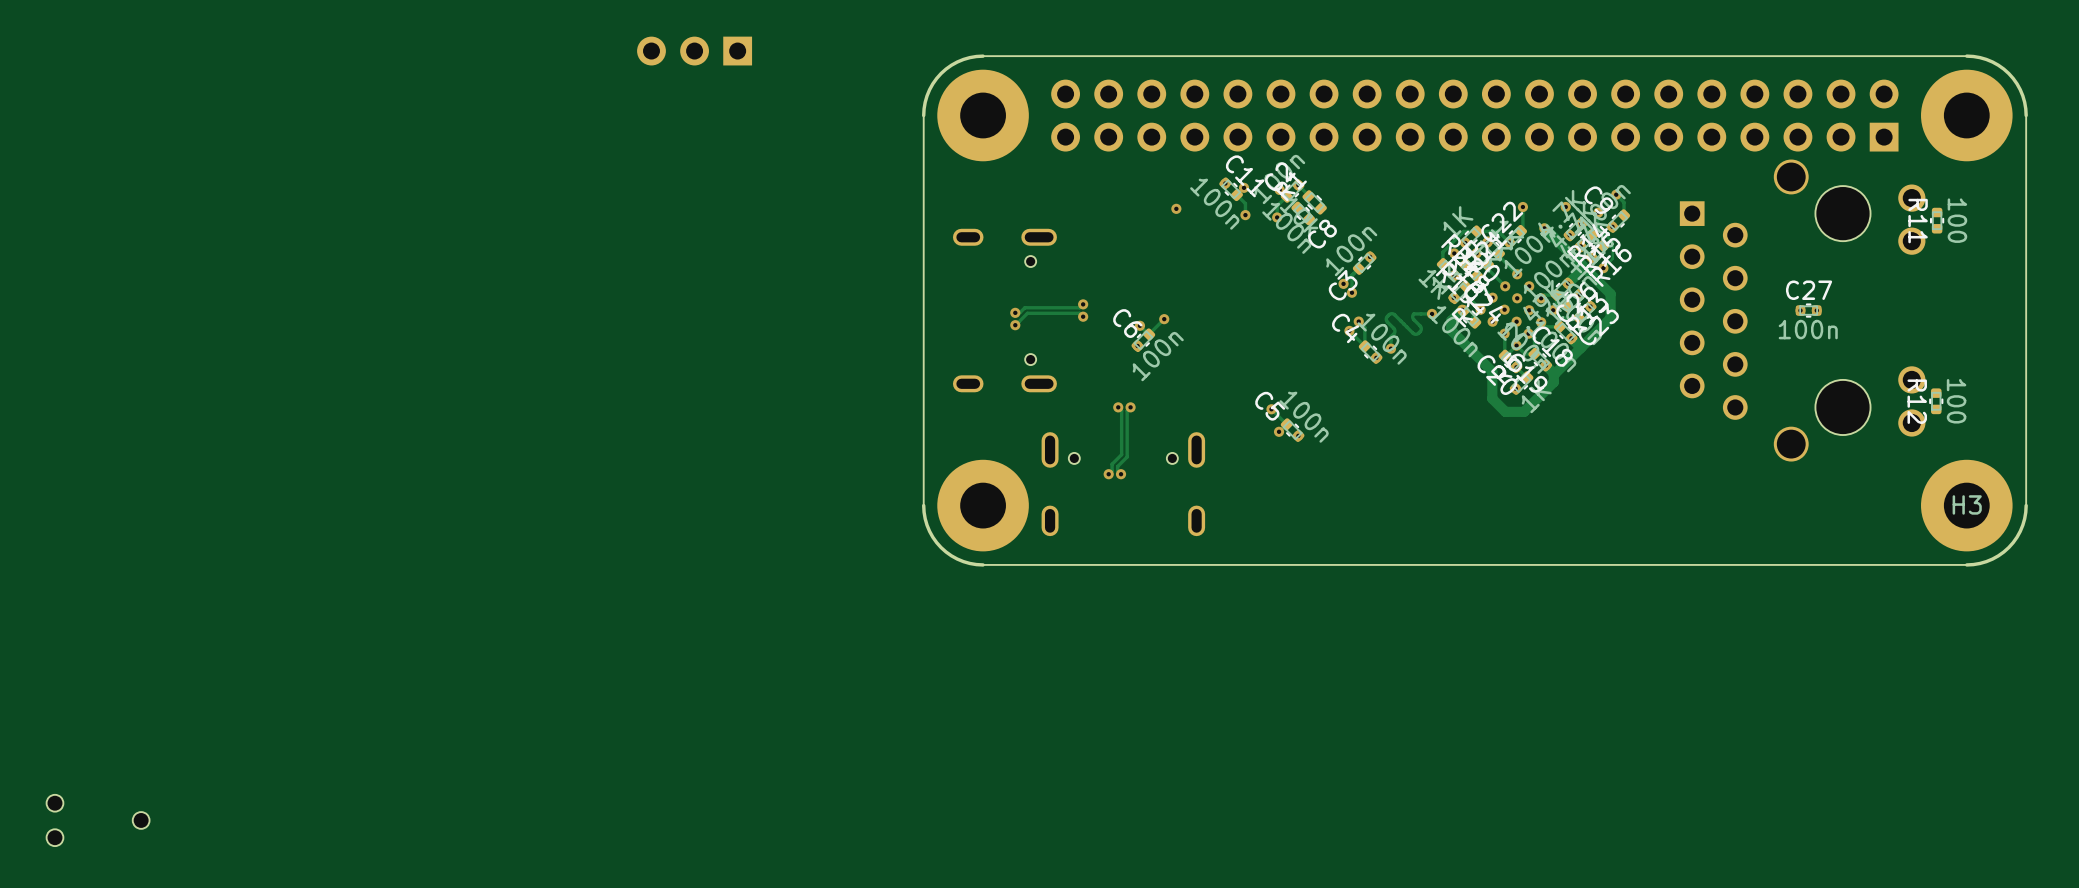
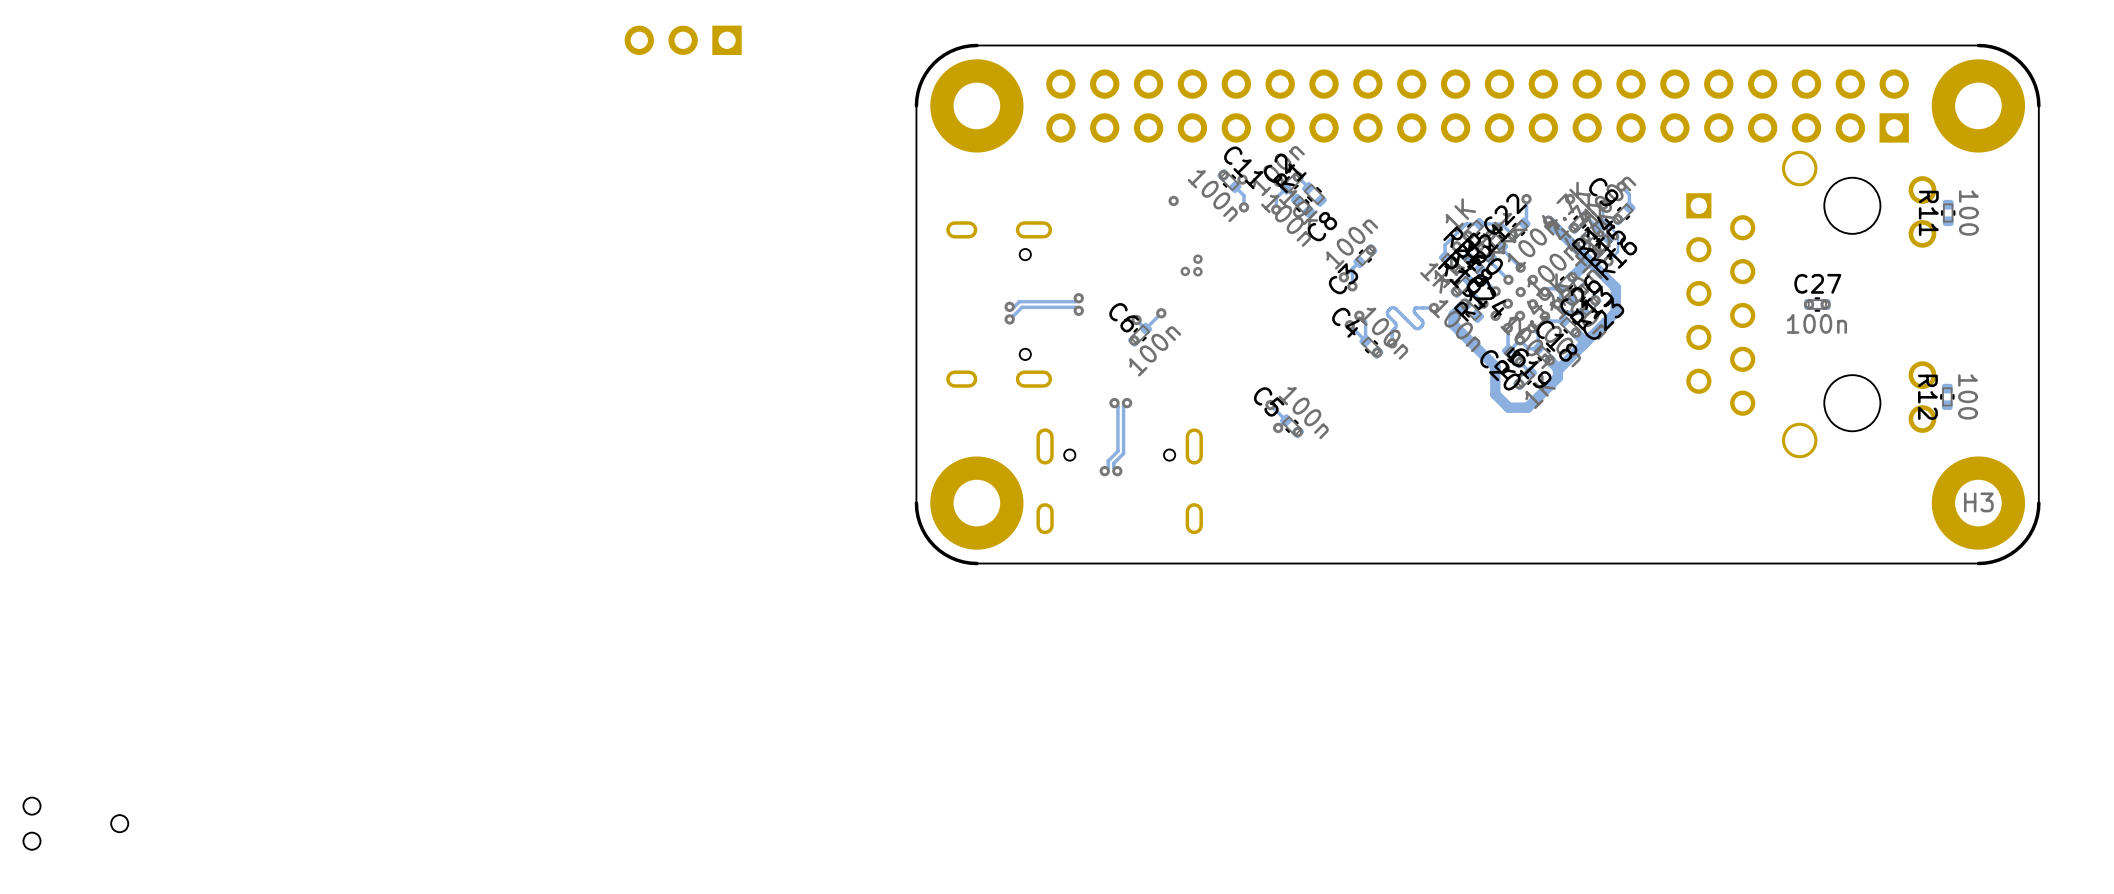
via: none -> (1197, 259)
via: none -> (1185, 271)
via: none -> (1197, 271)

